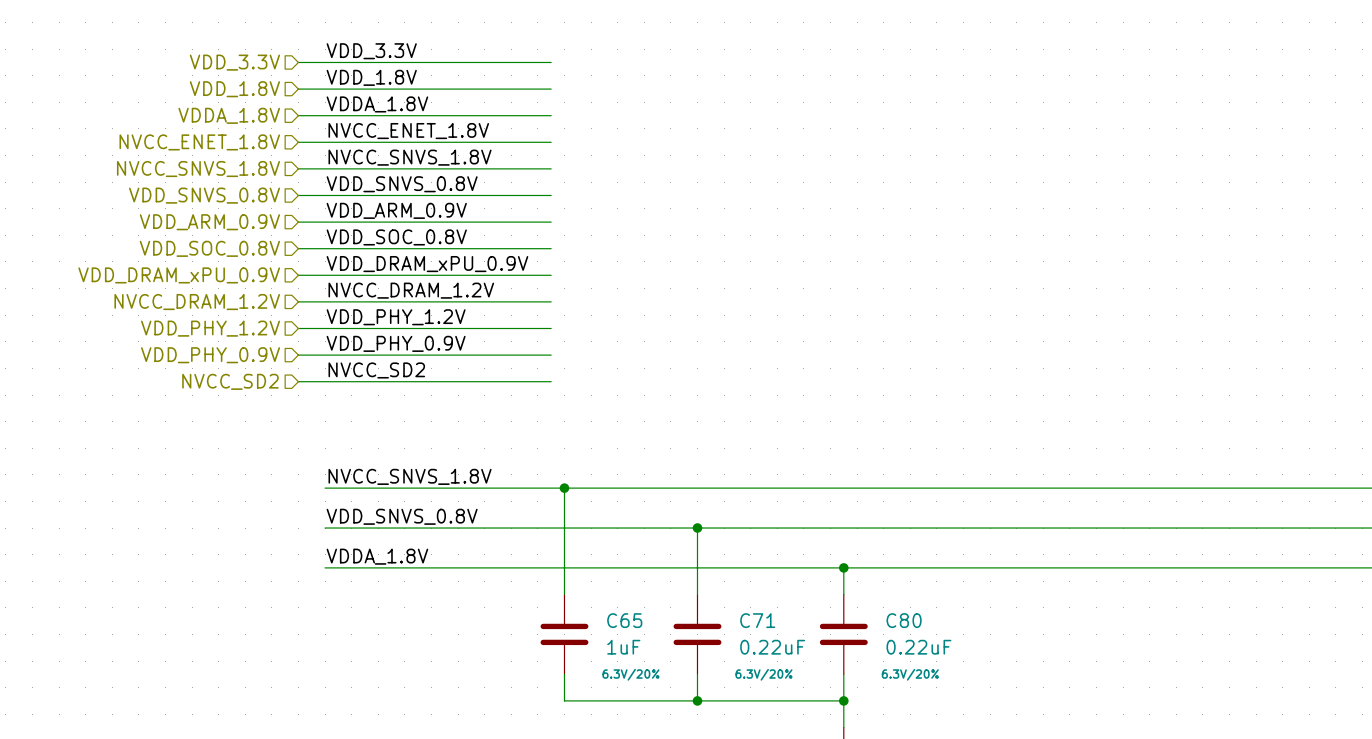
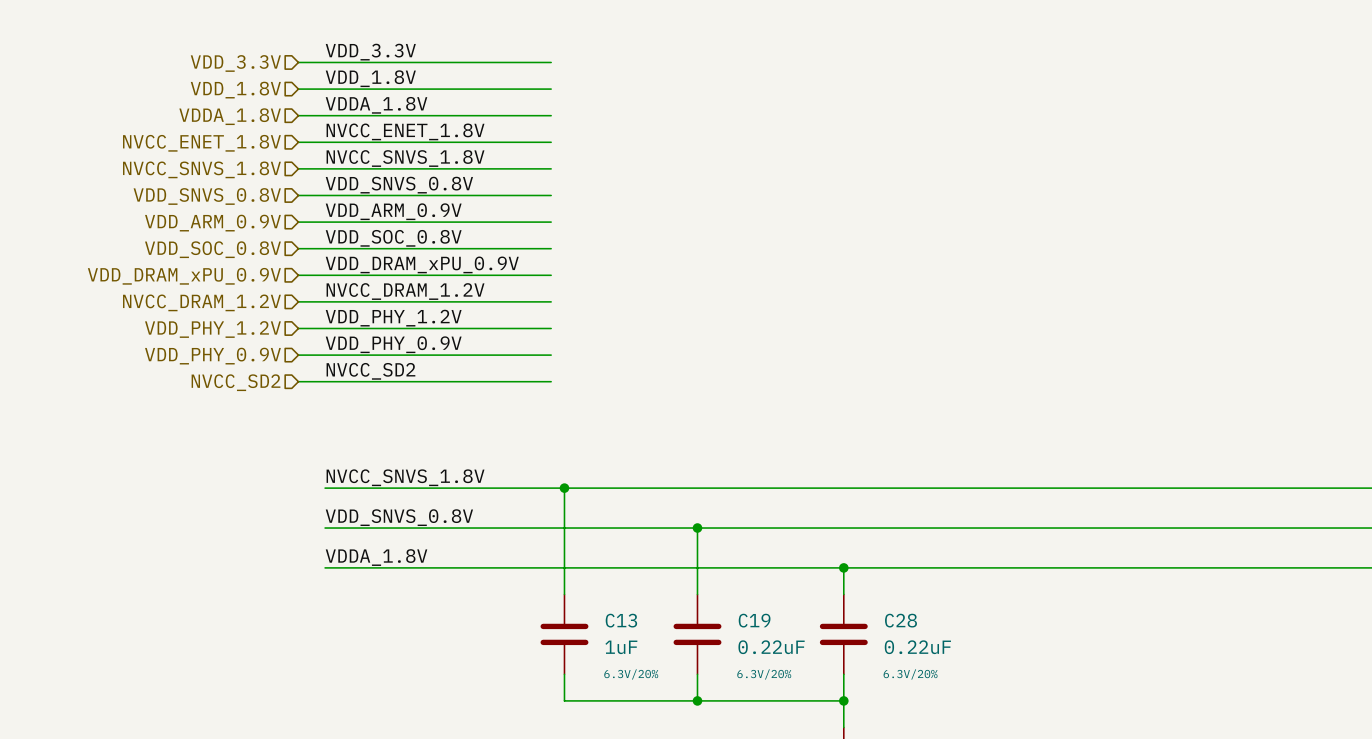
C65 name: C65 (624, 620) -> C13 (621, 620)
C71 name: C71 (757, 620) -> C19 (754, 620)
C80 name: C80 (904, 620) -> C28 (900, 620)

